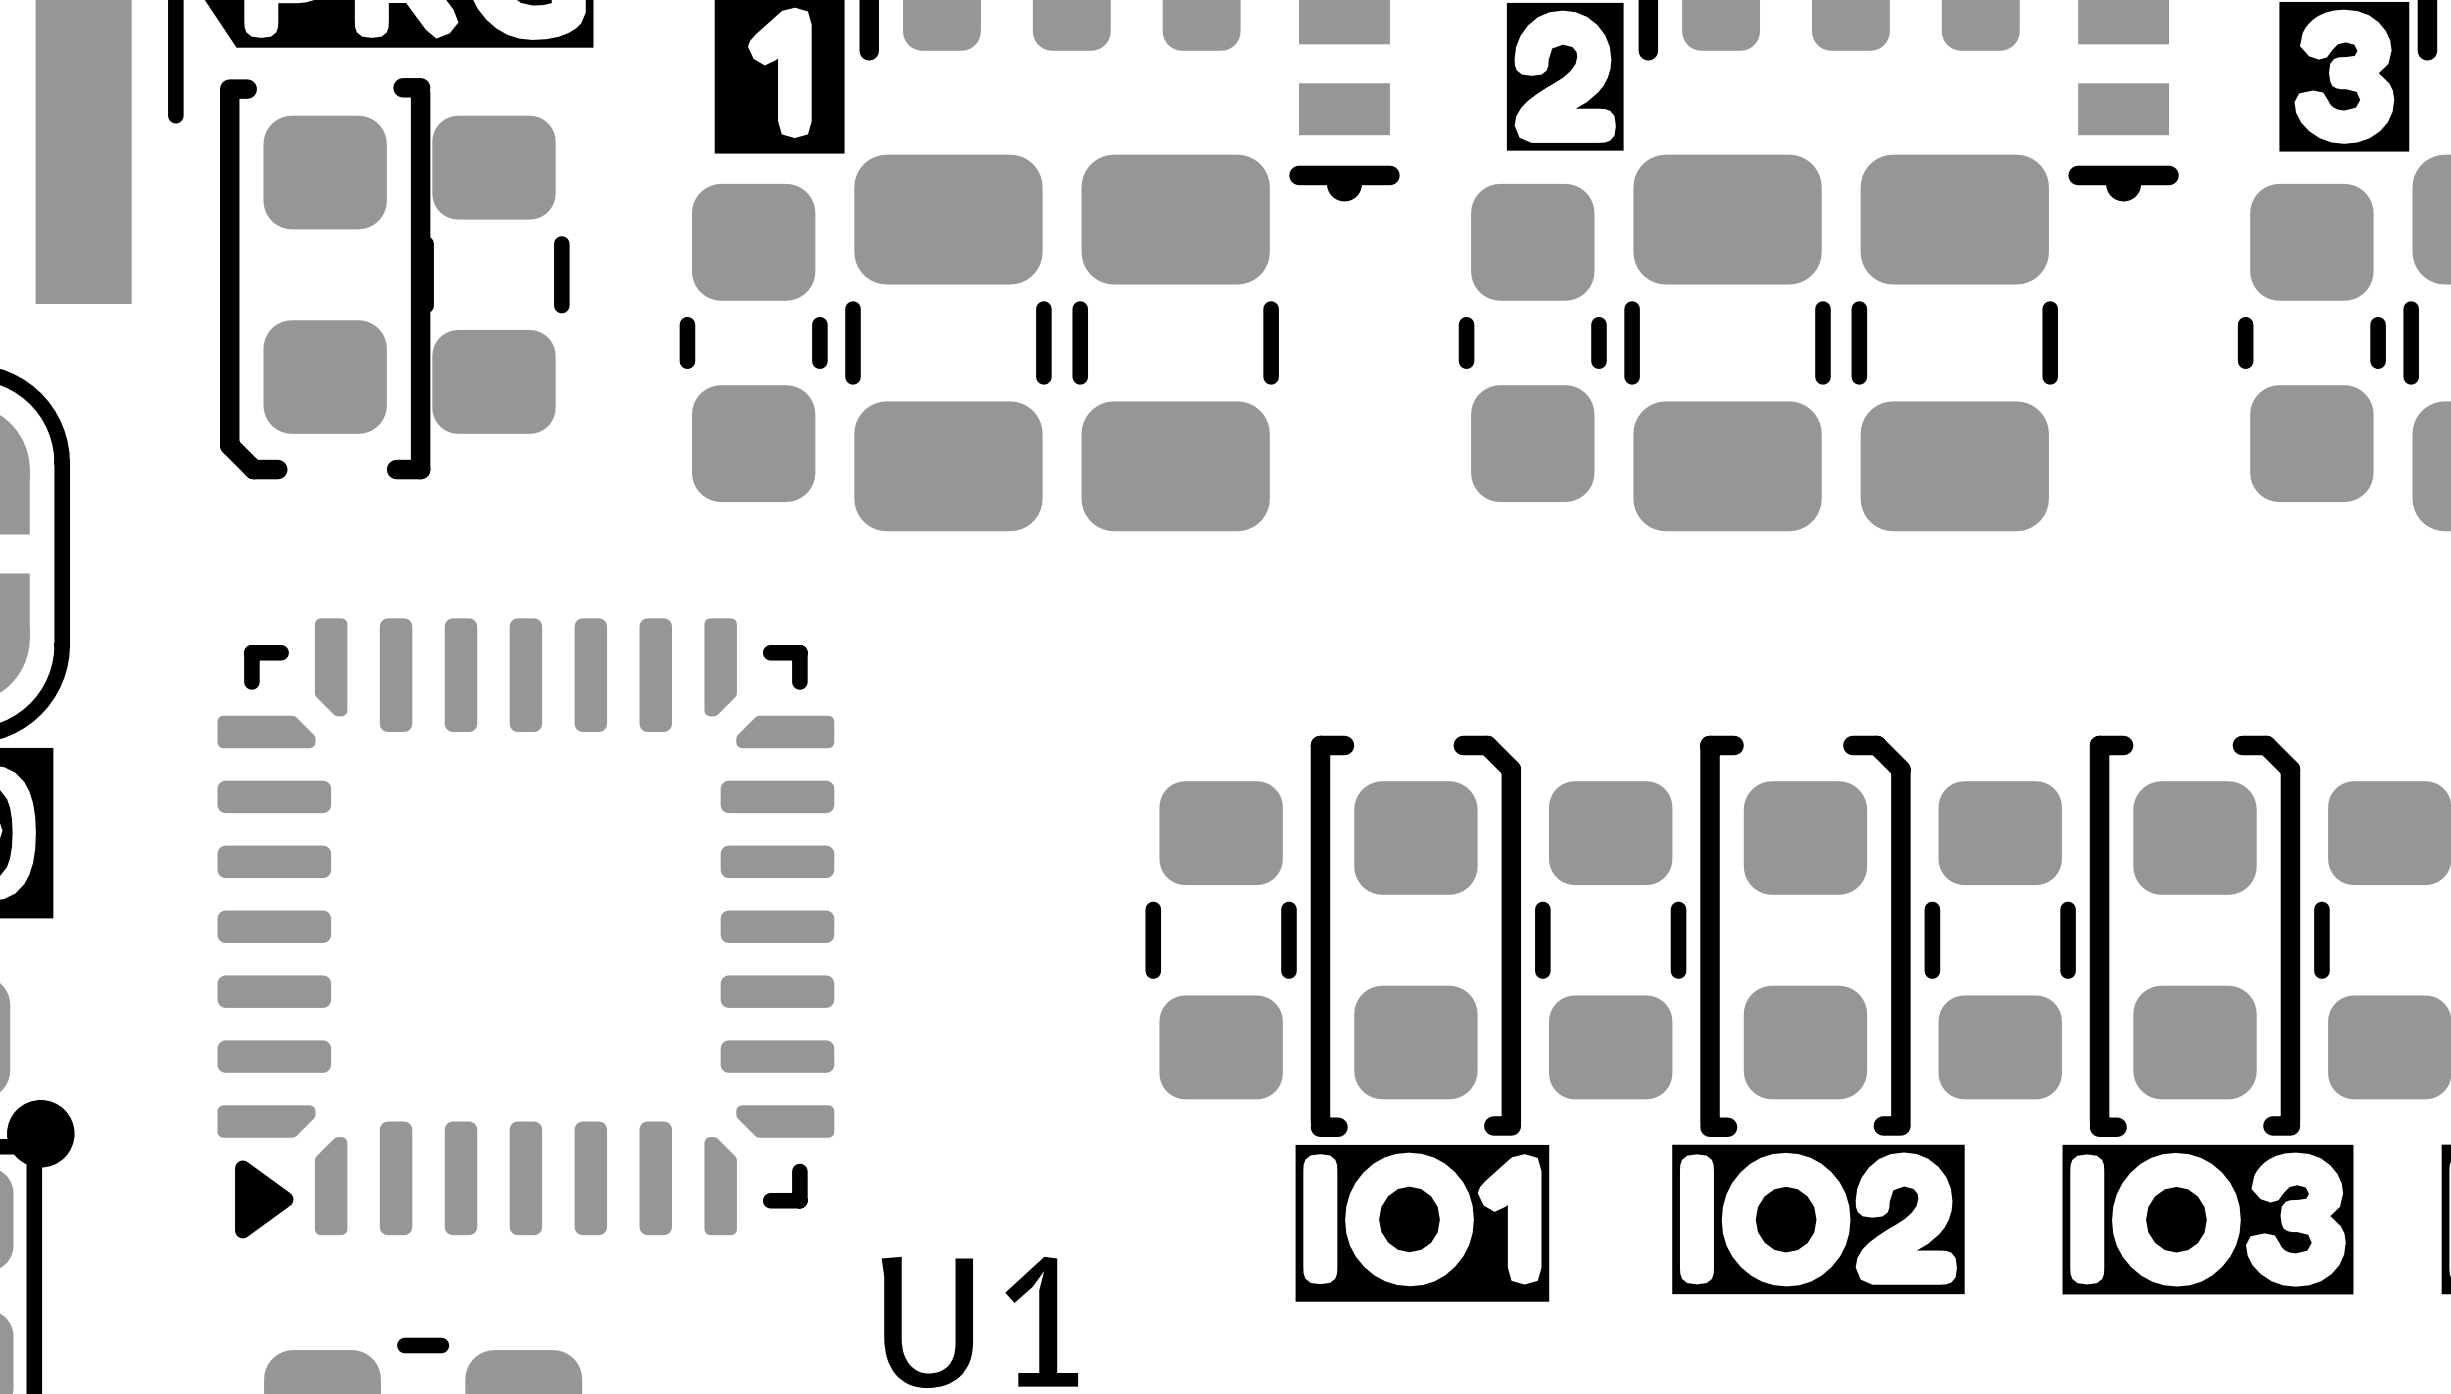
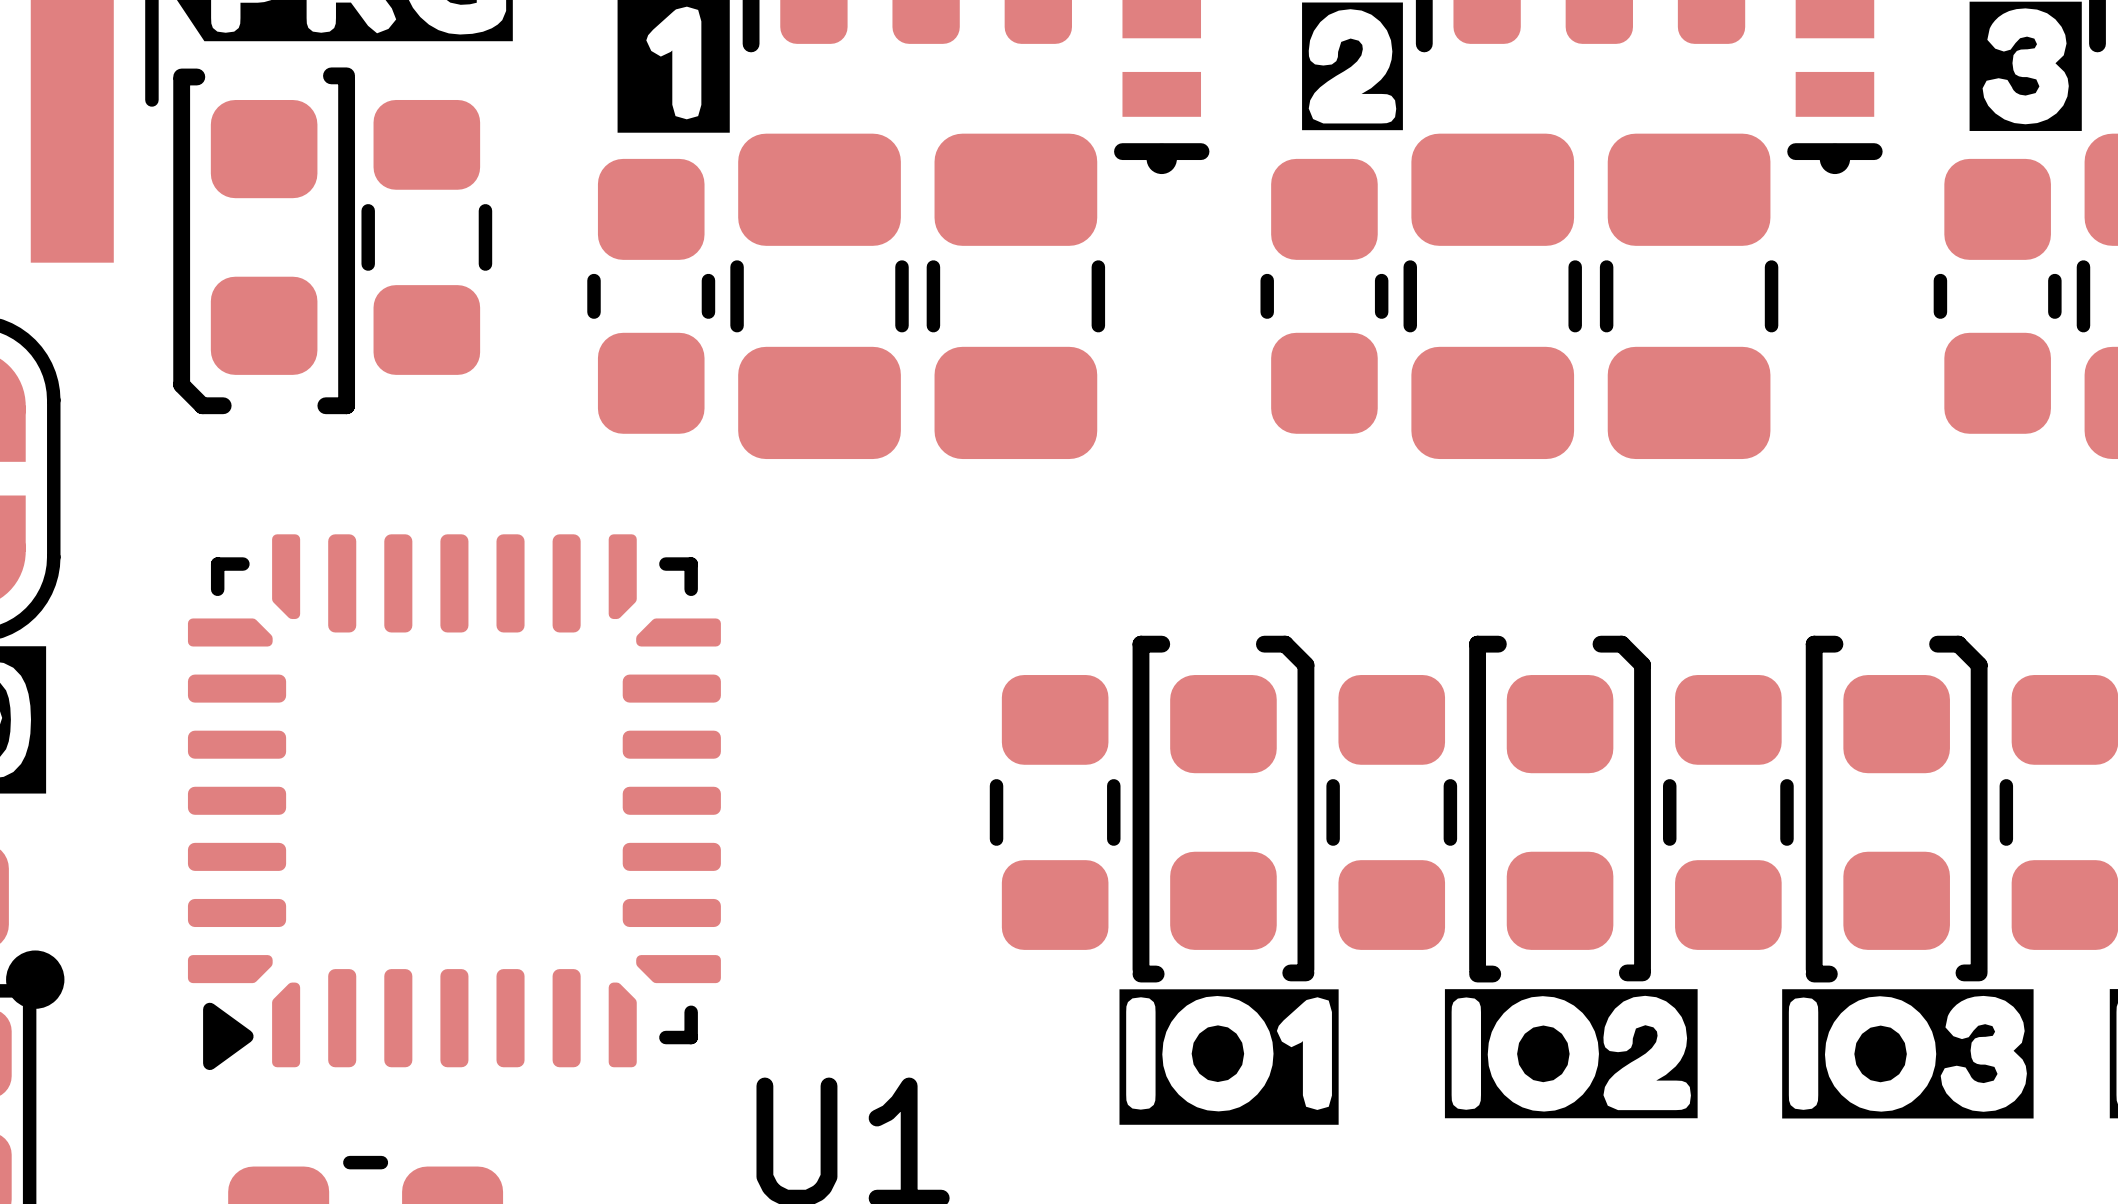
part position: (325, 278) -> (264, 240)

